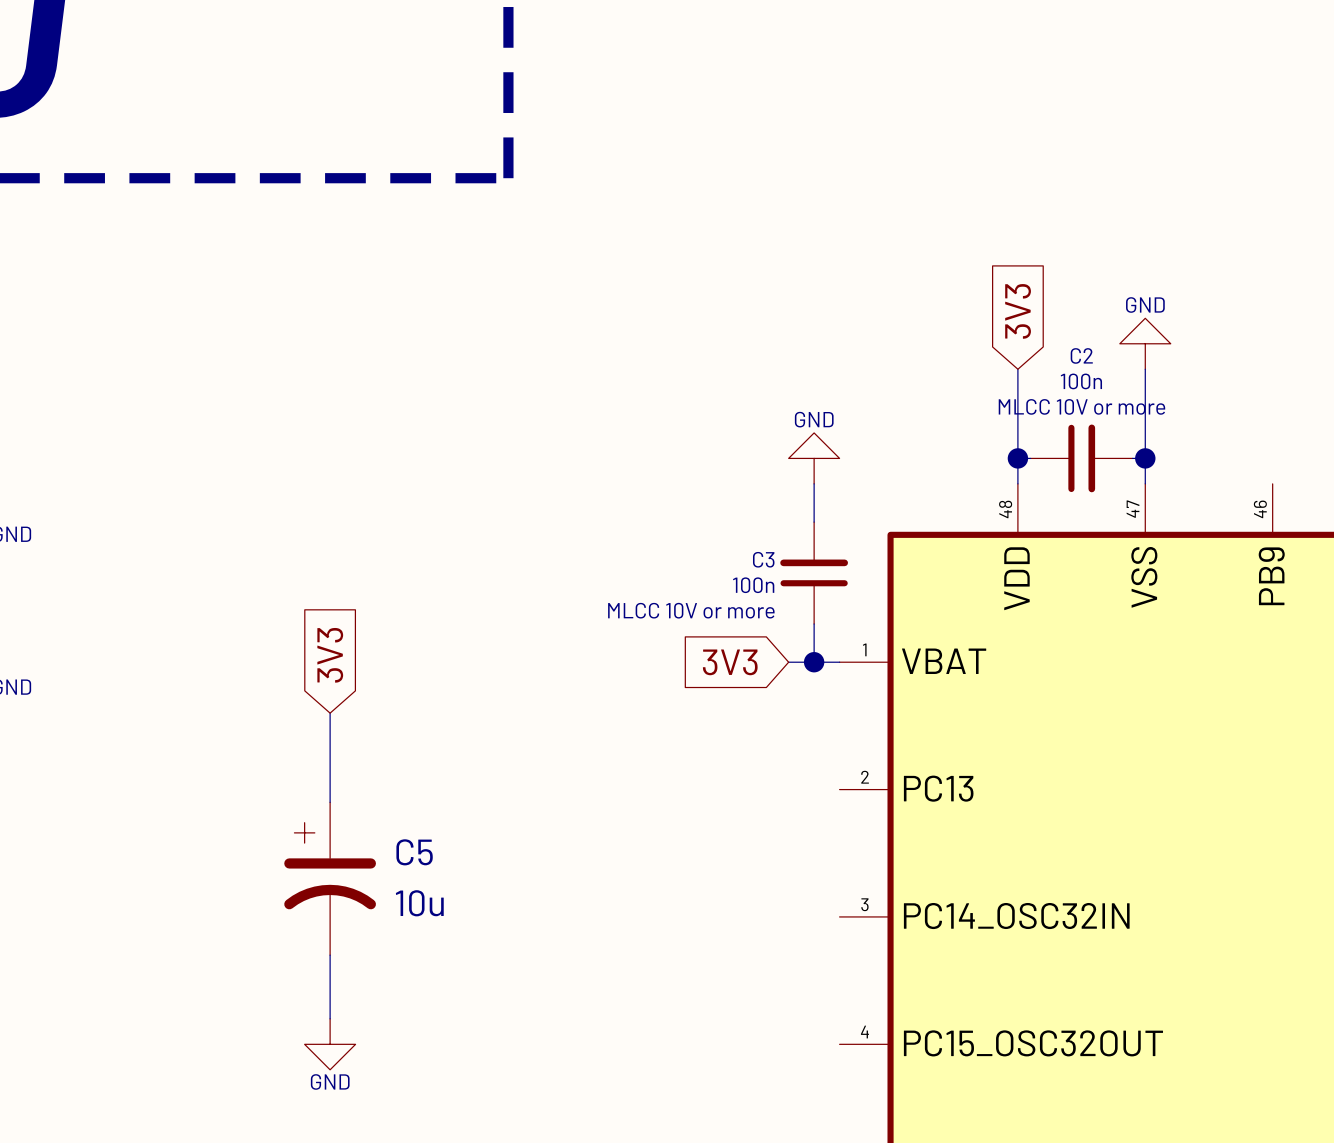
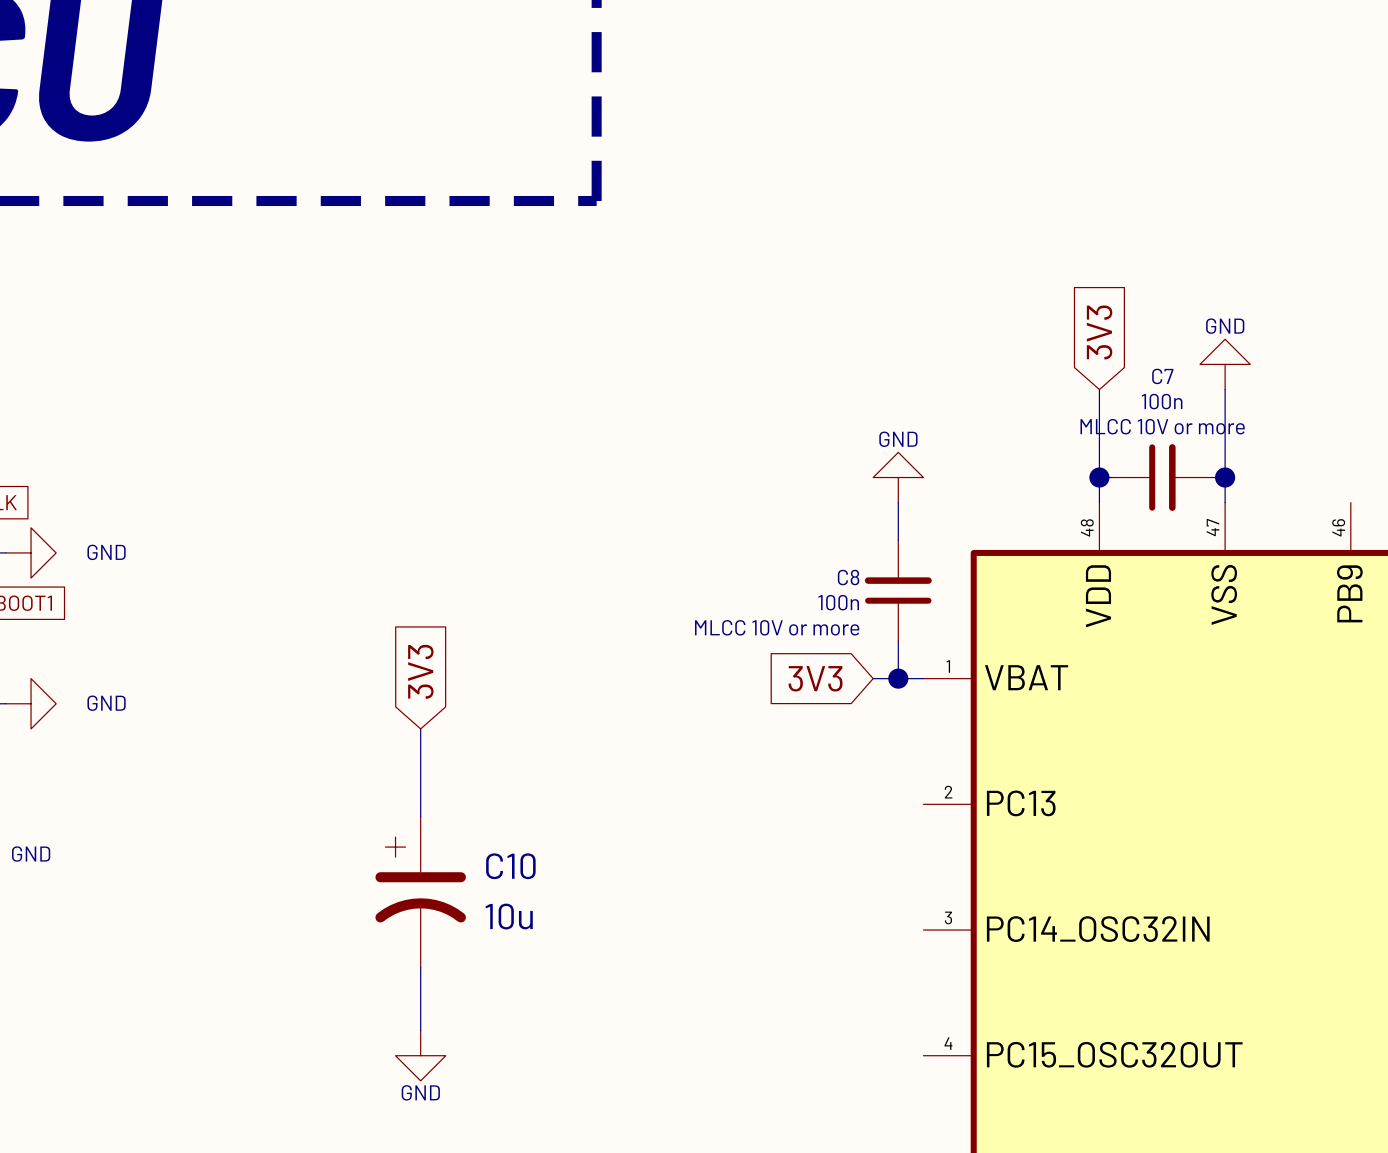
C2 name: C2 (1081, 355) -> C7 (1162, 376)
C3 name: C3 (763, 559) -> C8 (848, 577)
C5 name: C5 (414, 852) -> C10 (510, 866)

